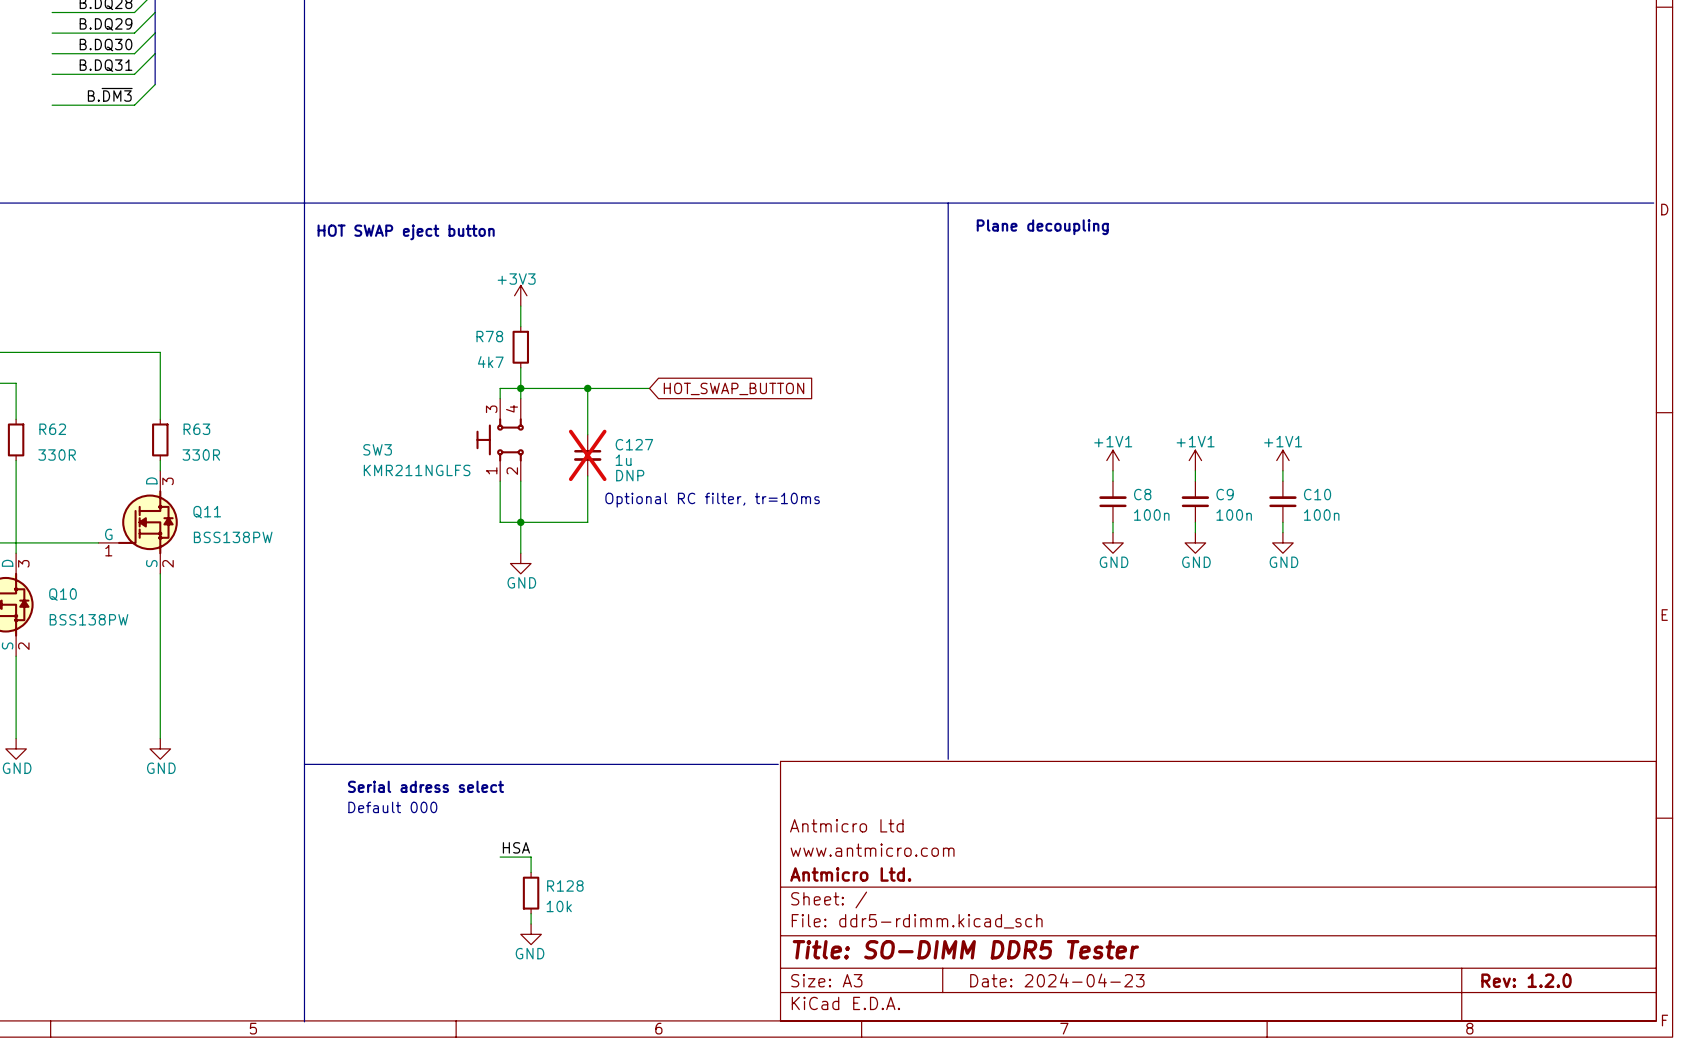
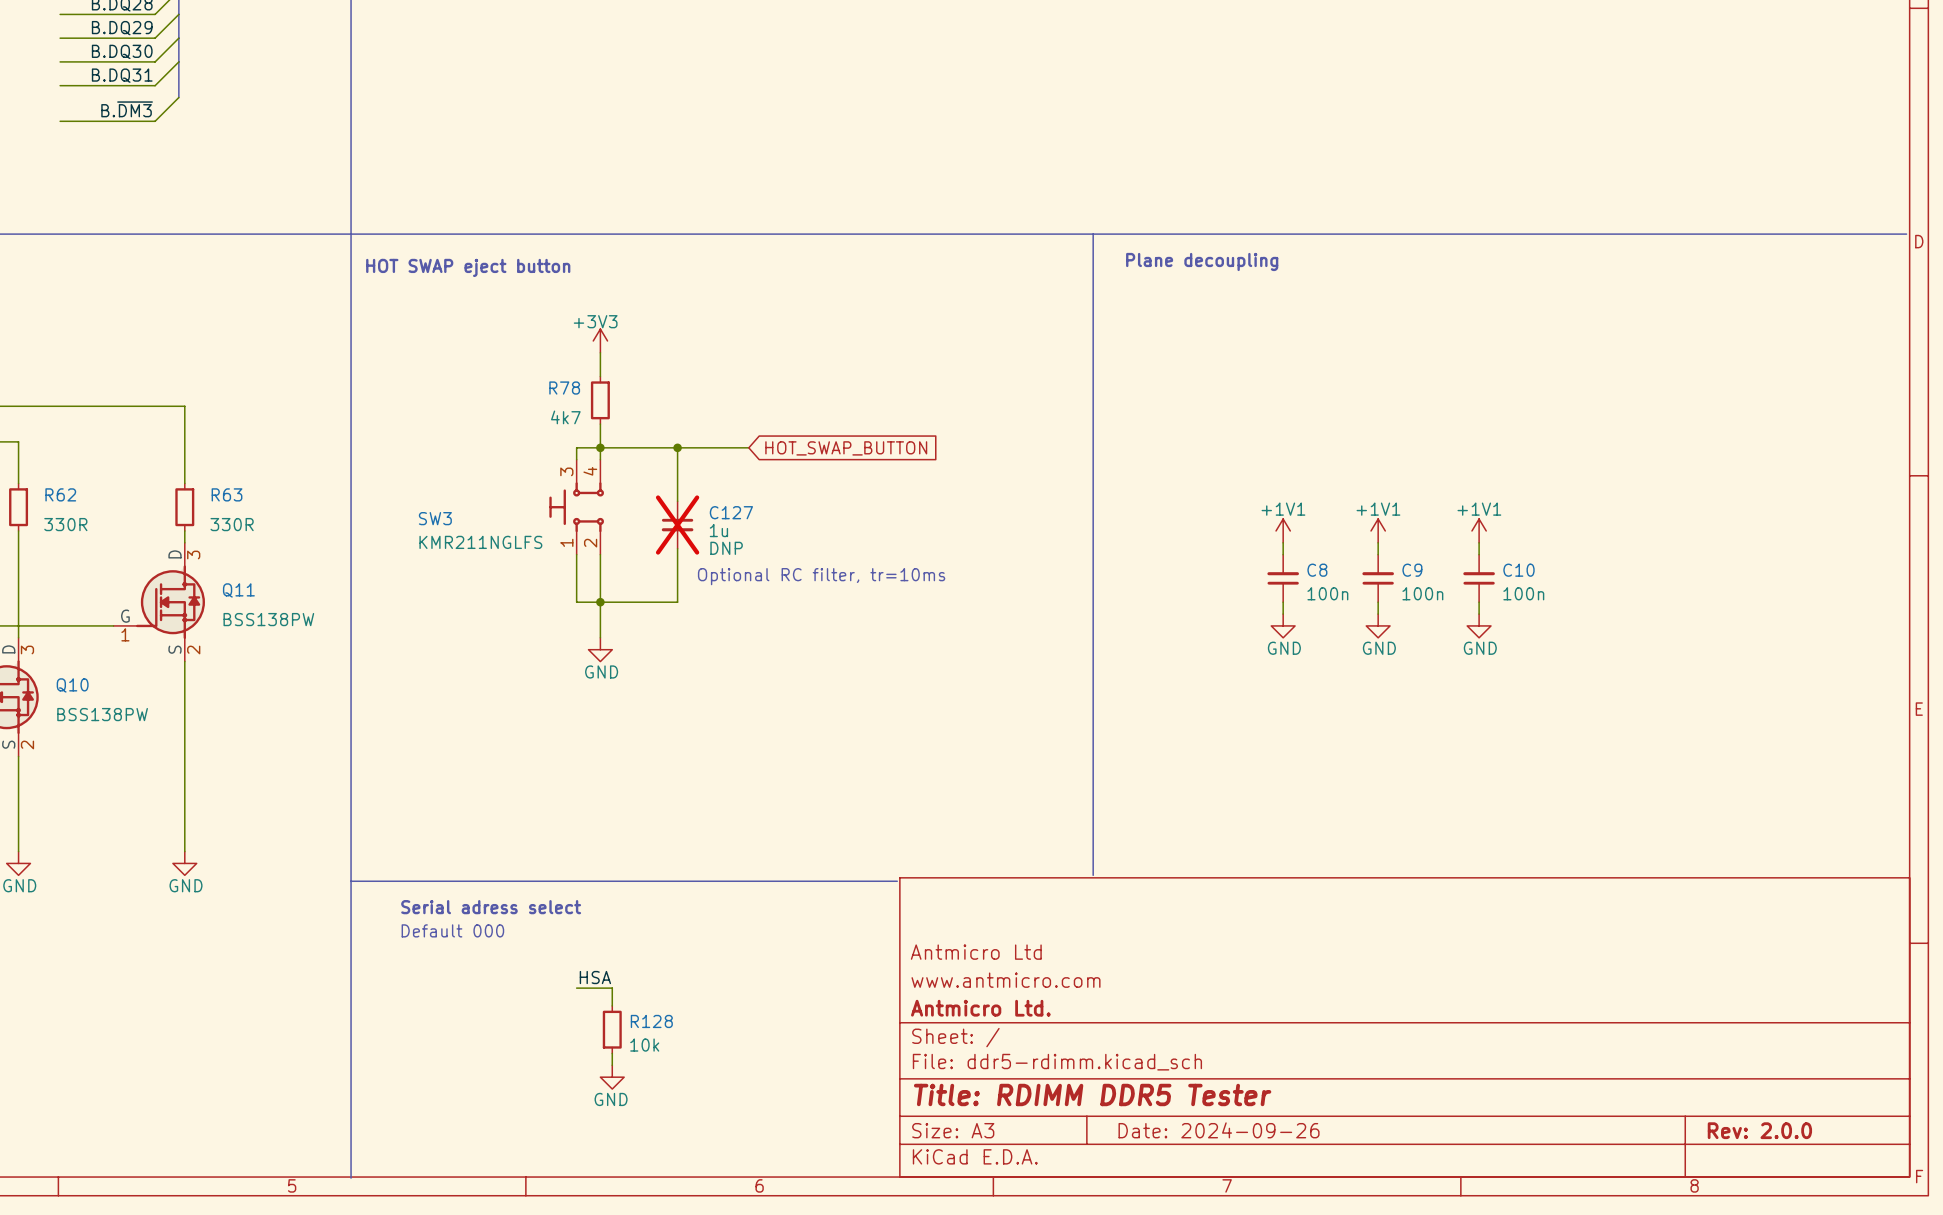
title block: Title: SO-DIMM DDR5 Tester (965, 949) -> Title: RDIMM DDR5 Tester (1092, 1094)
title block: Date: 2024-04-23 (1057, 980) -> Date: 2024-09-26 (1219, 1130)
title block: Rev: 1.2.0 (1526, 980) -> Rev: 2.0.0 (1759, 1130)

